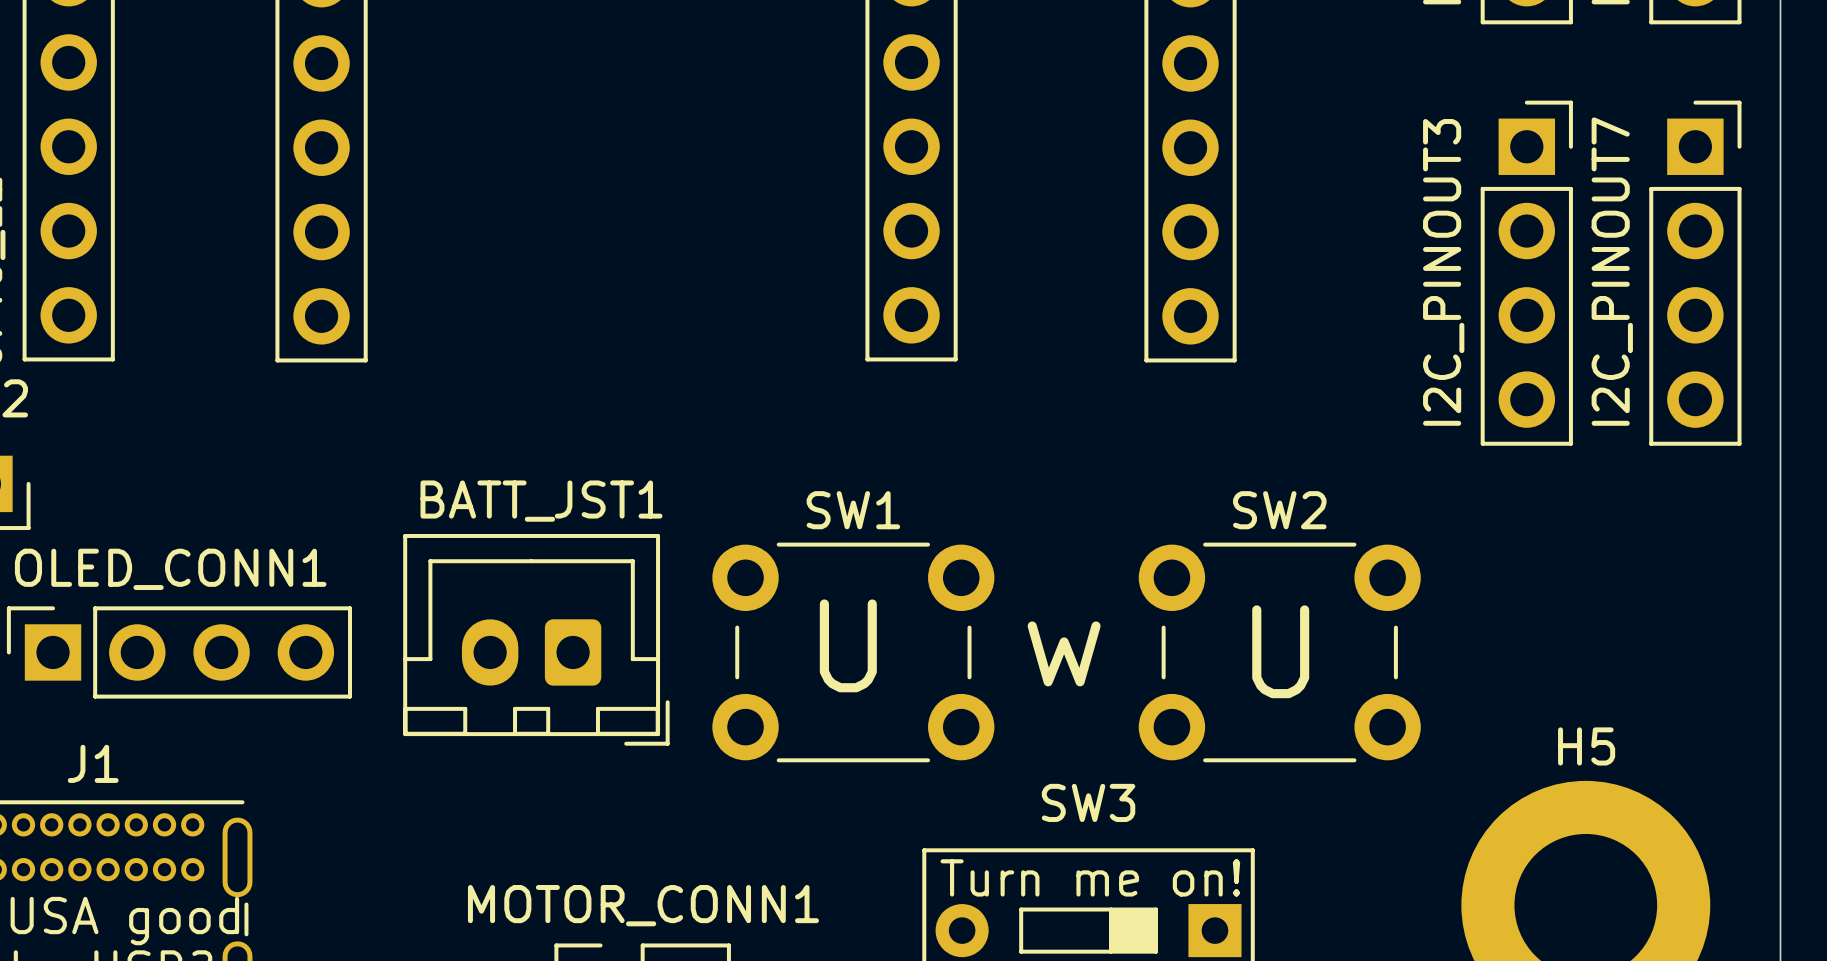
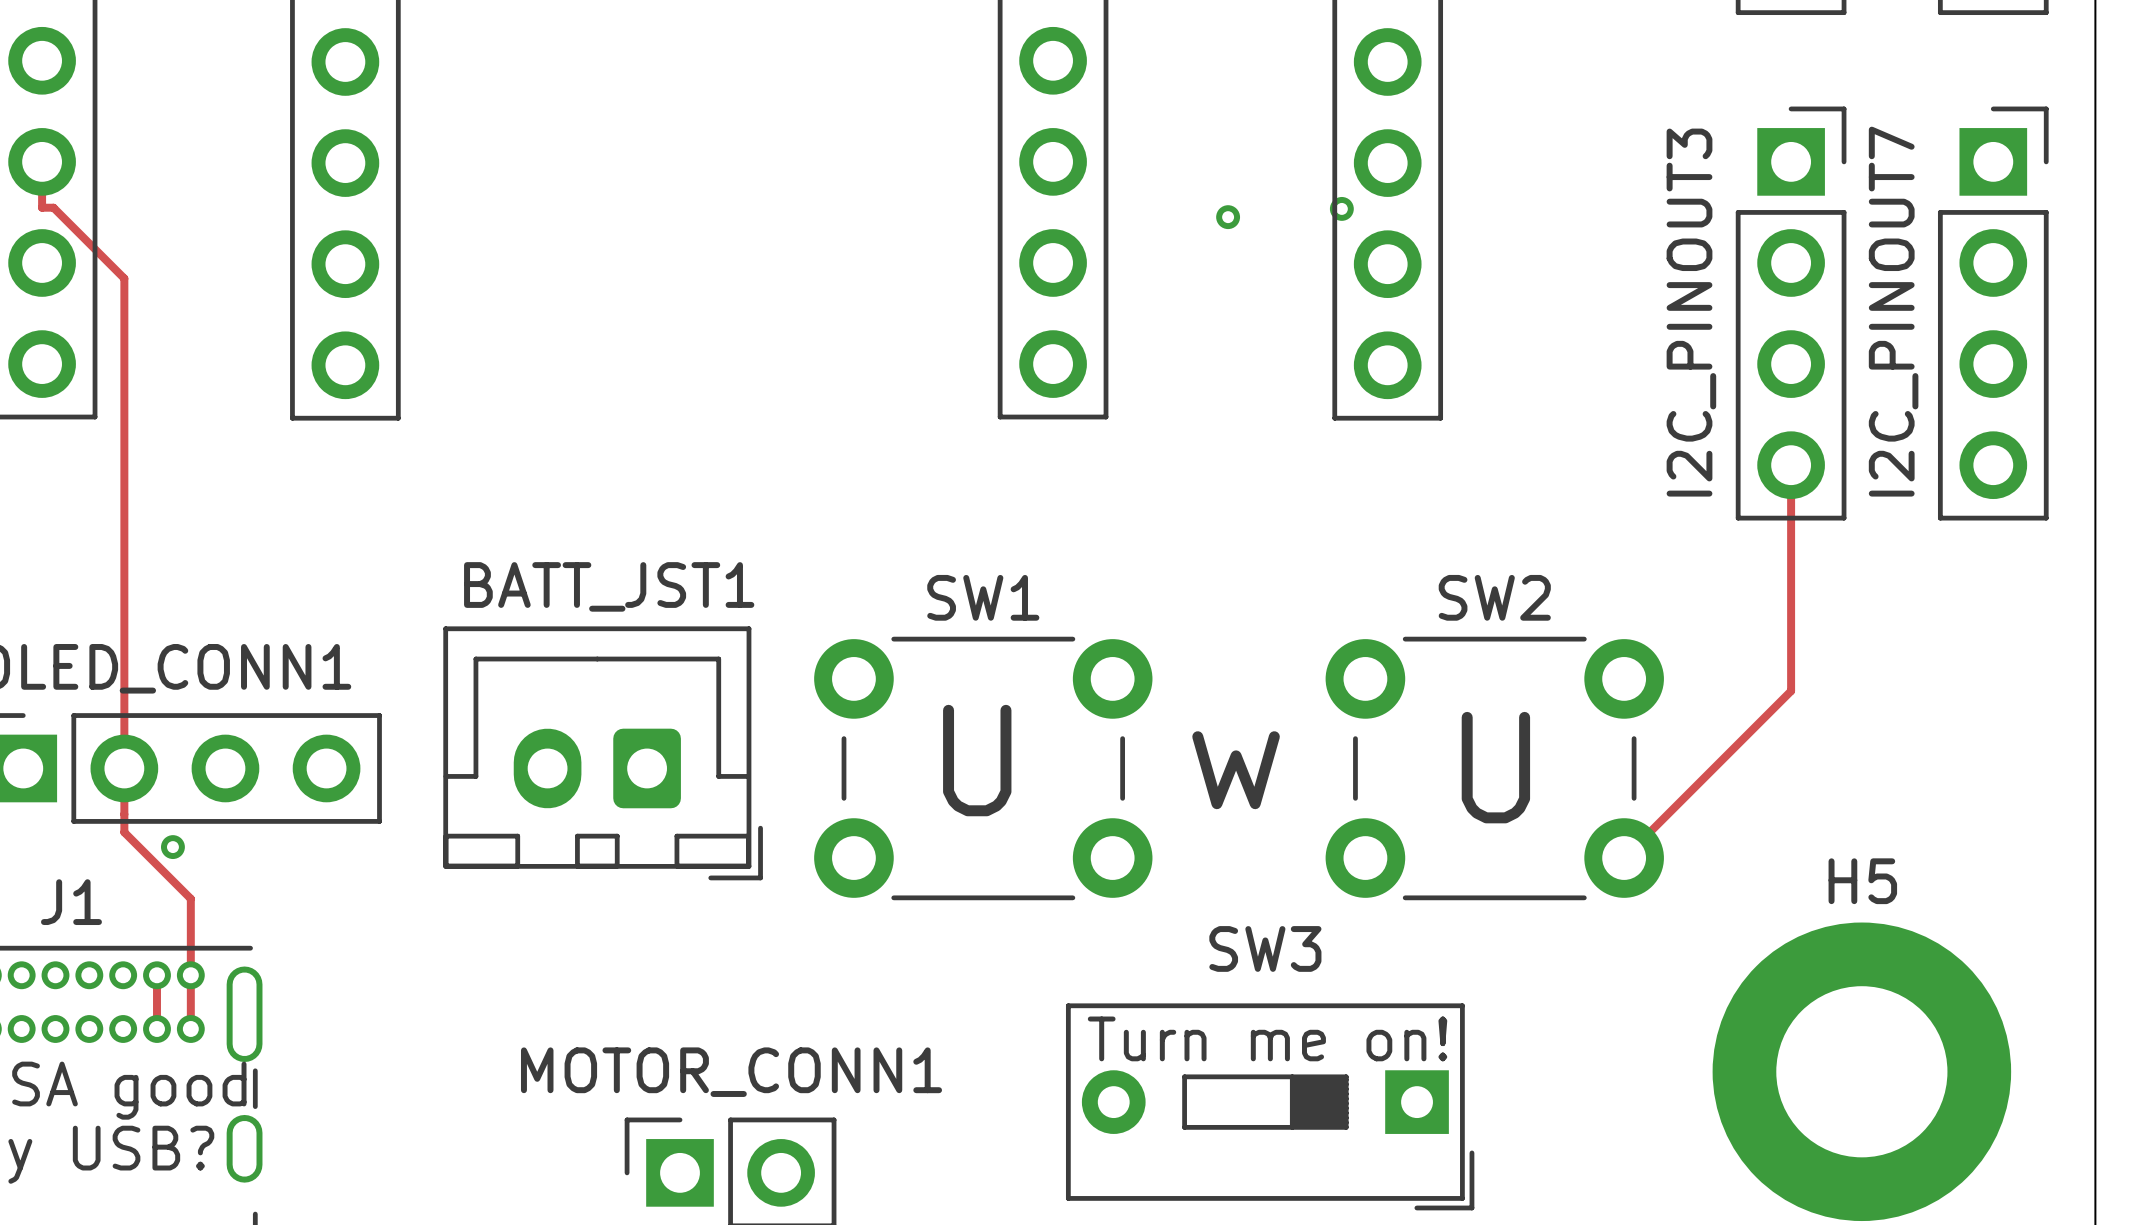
track: none -> (42, 161) (42, 207) (53, 207) (124, 278) (124, 832) (190, 898) (190, 1028)
via: none -> (1341, 208)
via: none -> (1228, 217)
track: none -> (1791, 465) (1791, 691) (1624, 858)
via: none -> (172, 847)
track: none -> (157, 975) (157, 1028)

